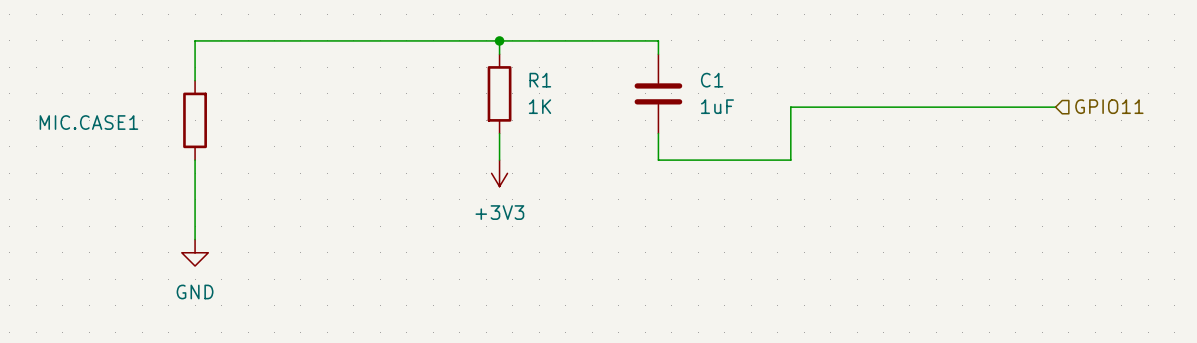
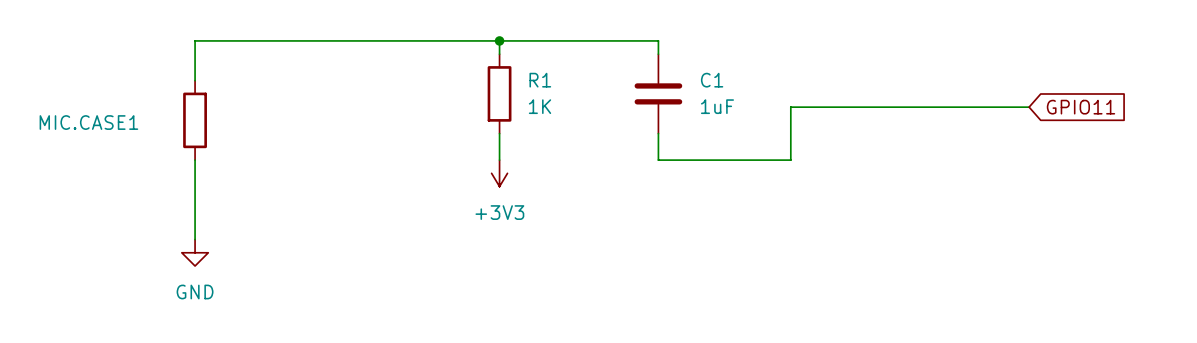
hierarchical label: GPIO11 (1109, 106) -> none
wire: (1029, 107) (1055, 107) -> none
global label: none -> GPIO11 (1080, 107)

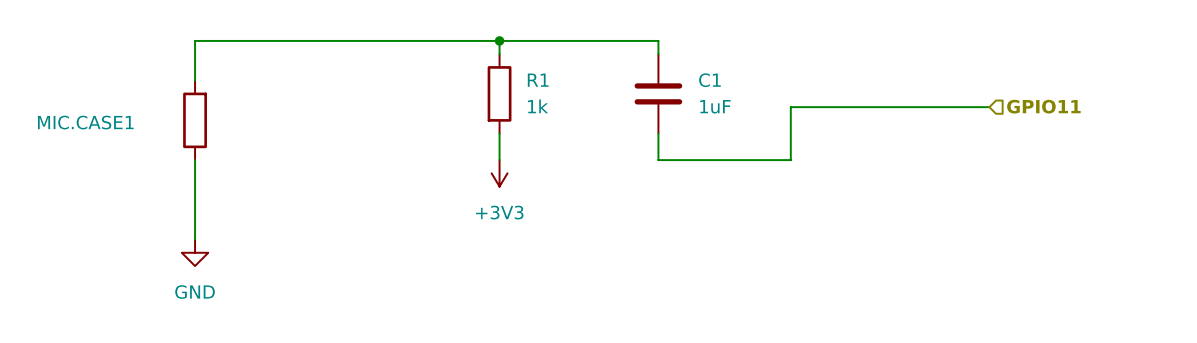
R1 value: 1K (540, 106) -> 1k (538, 106)
hierarchical label: none -> GPIO11 (1043, 106)
wire: (989, 107) (1029, 107) -> none
global label: GPIO11 (1080, 107) -> none

